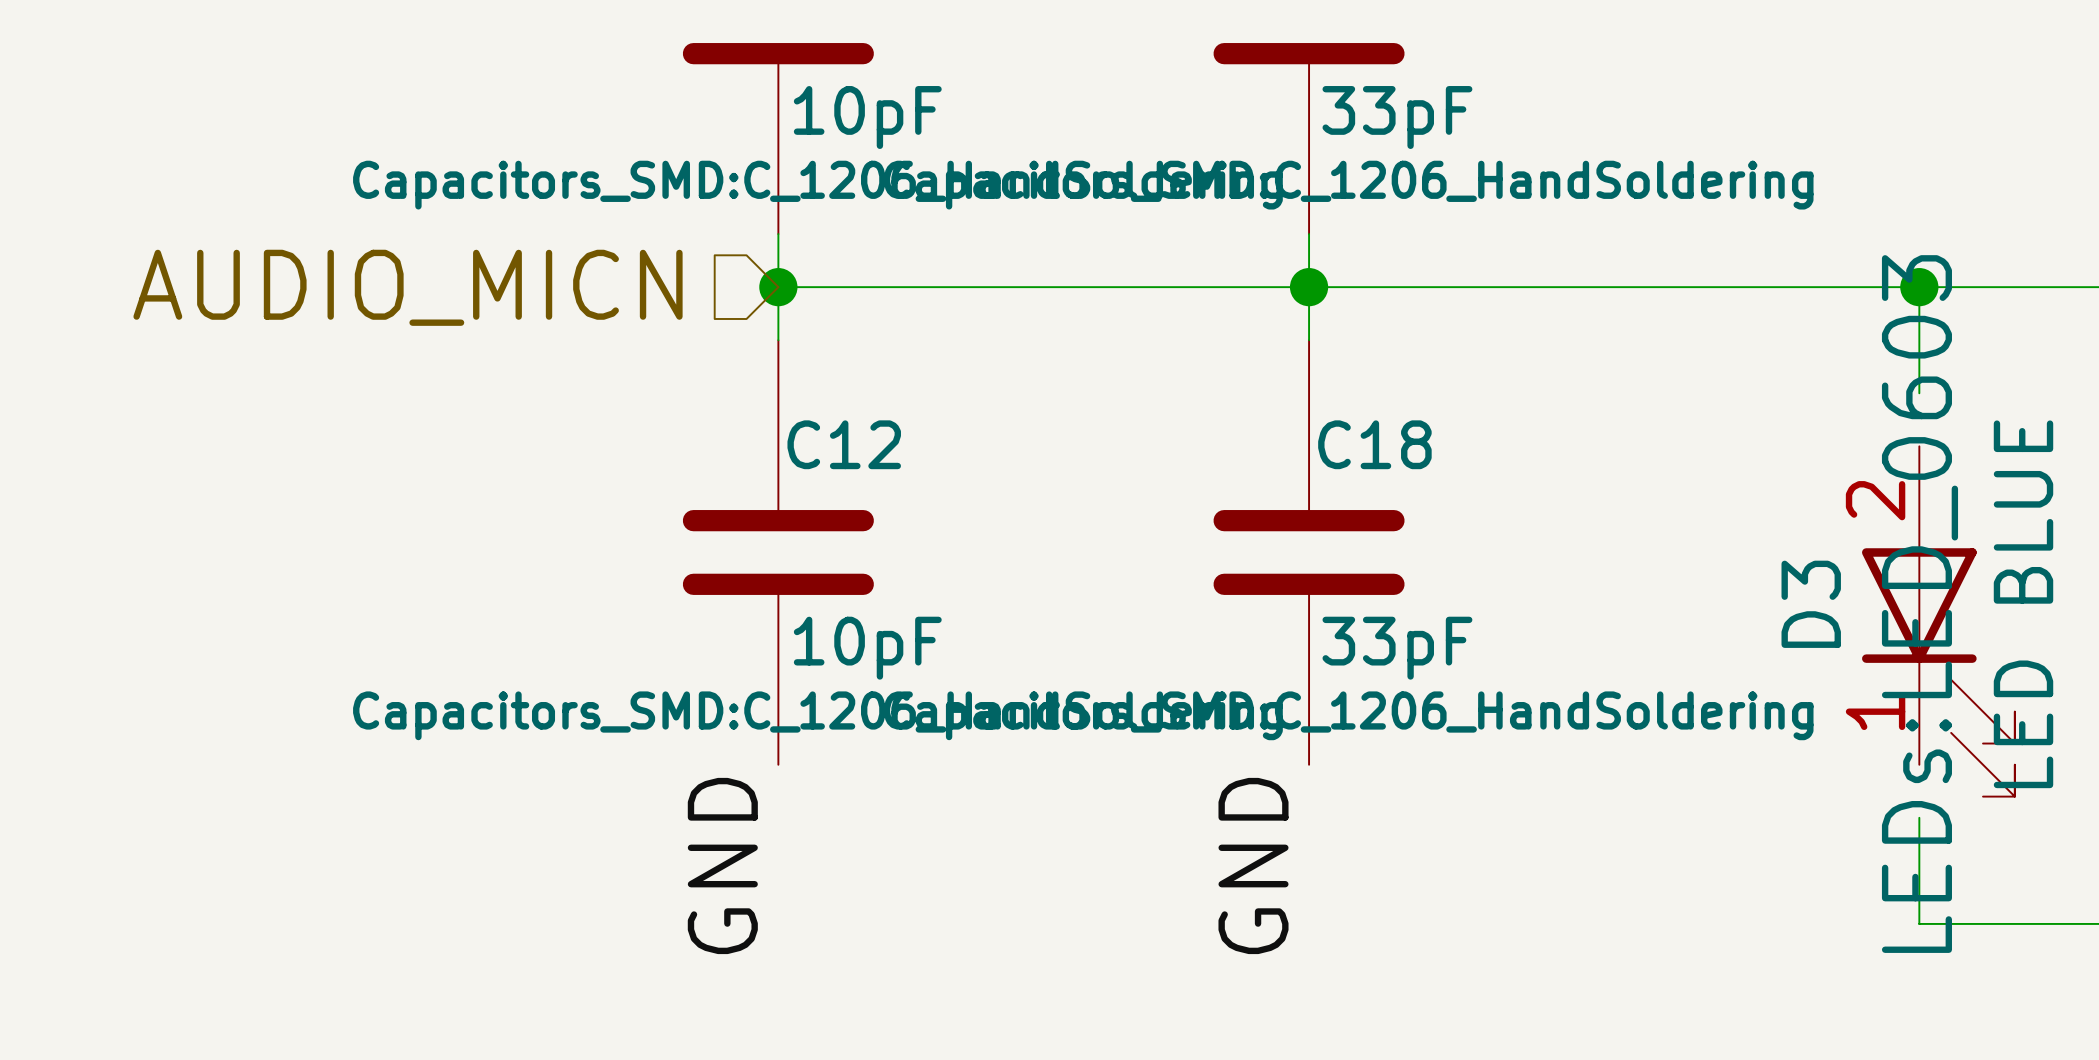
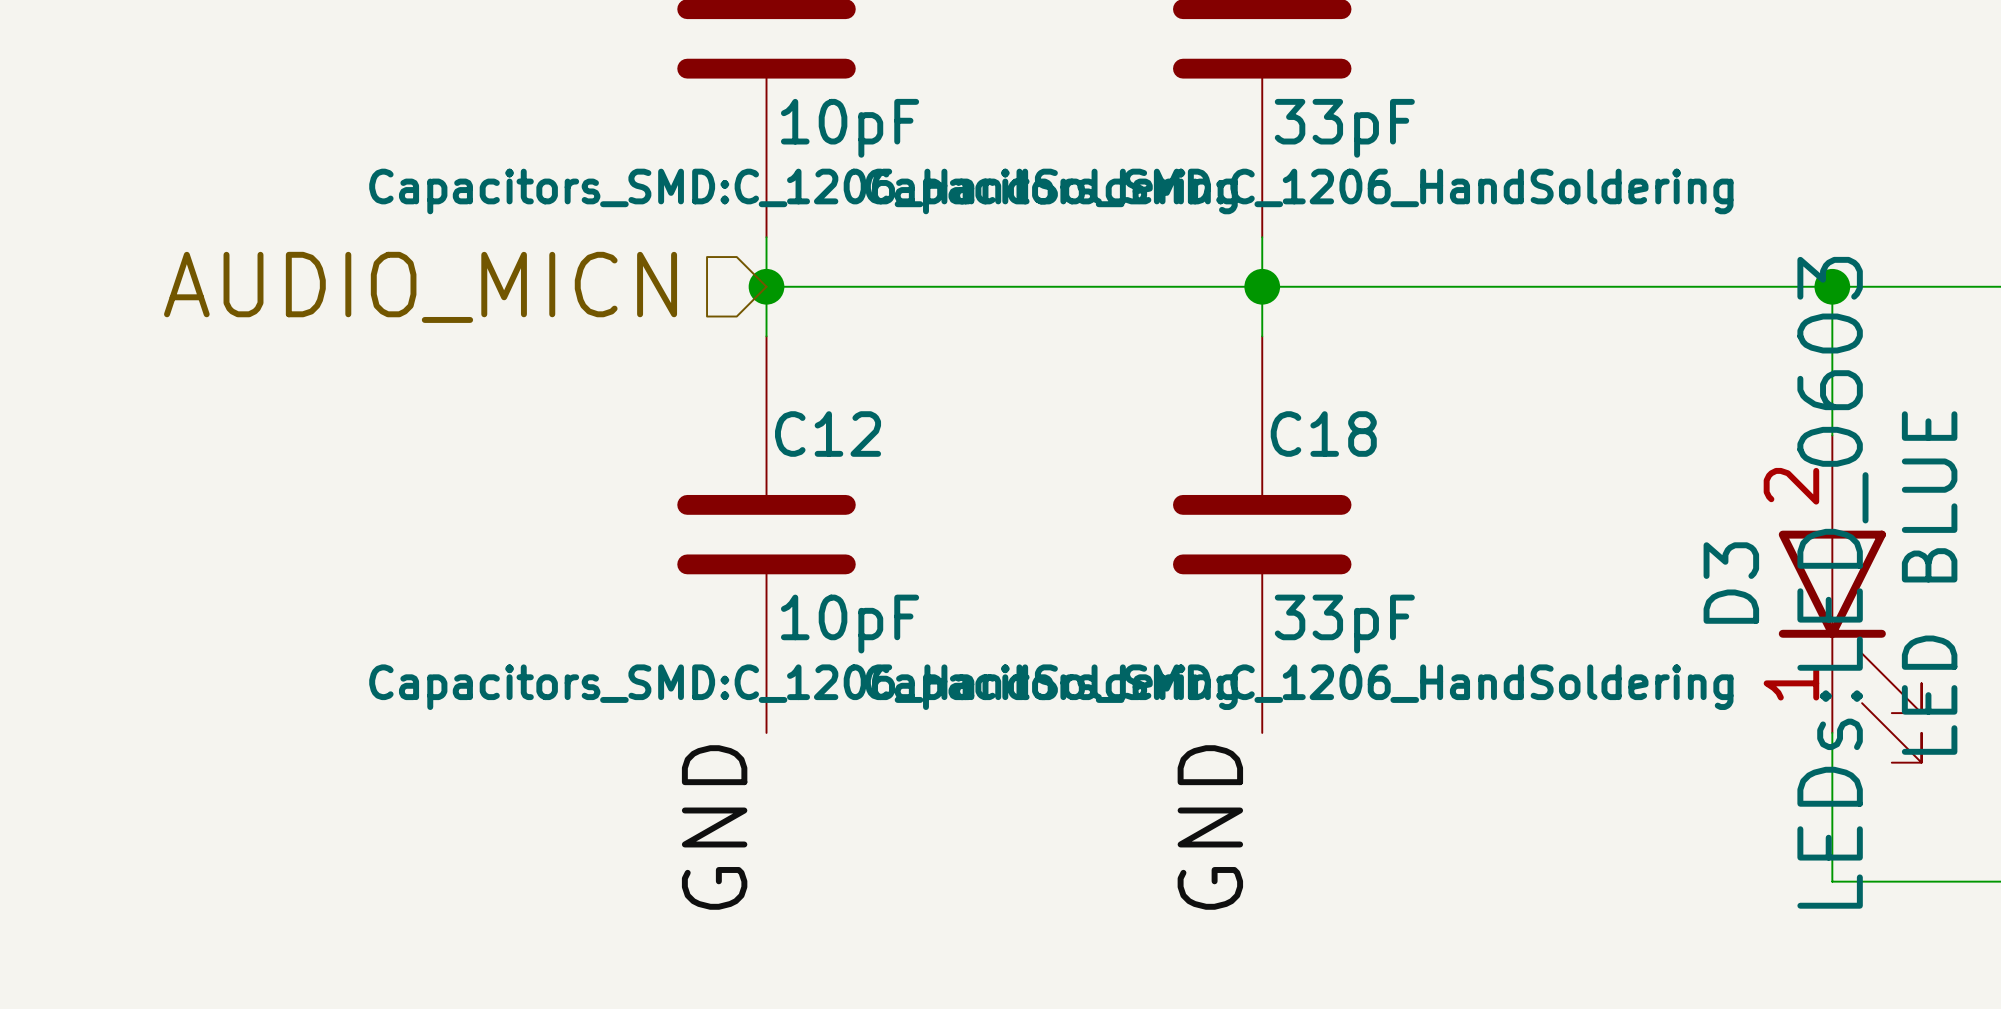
wire: none -> (1832, 385) (1832, 435)
wire: none -> (1832, 732) (1832, 782)

